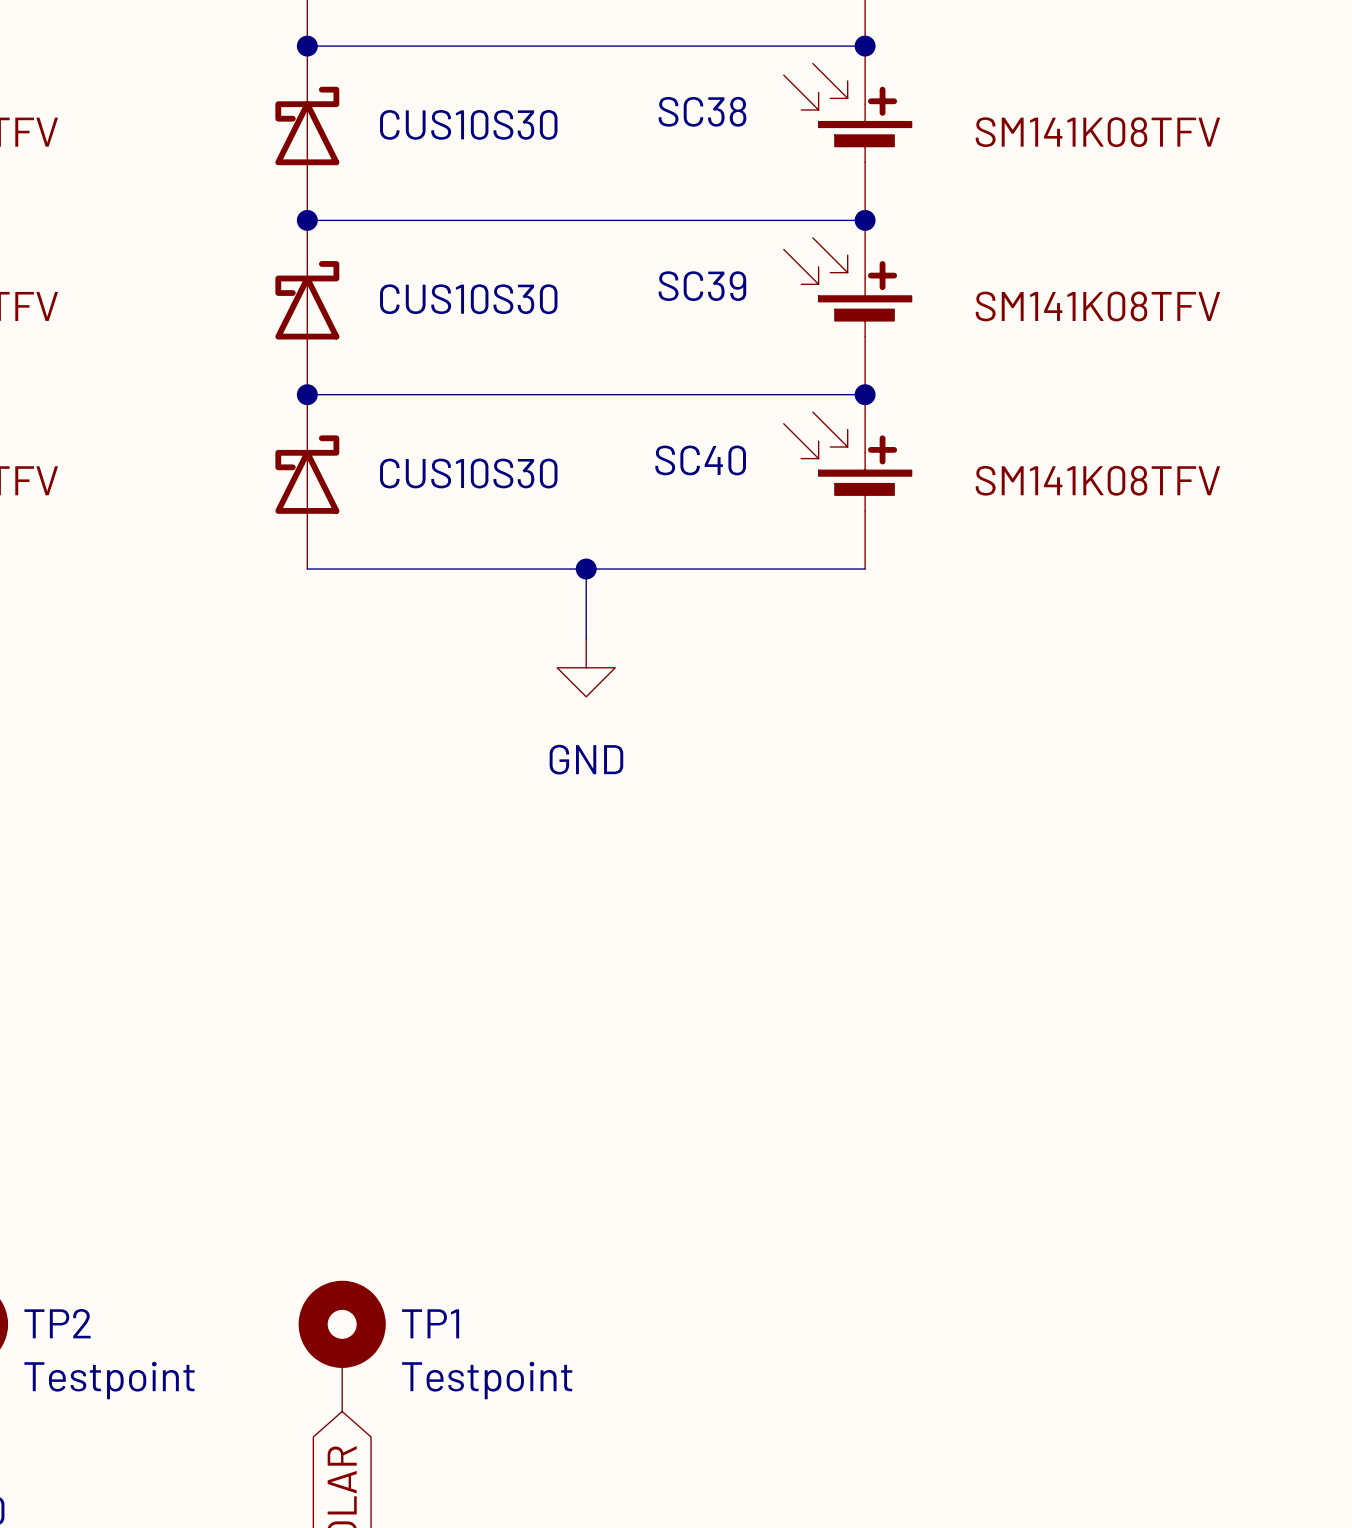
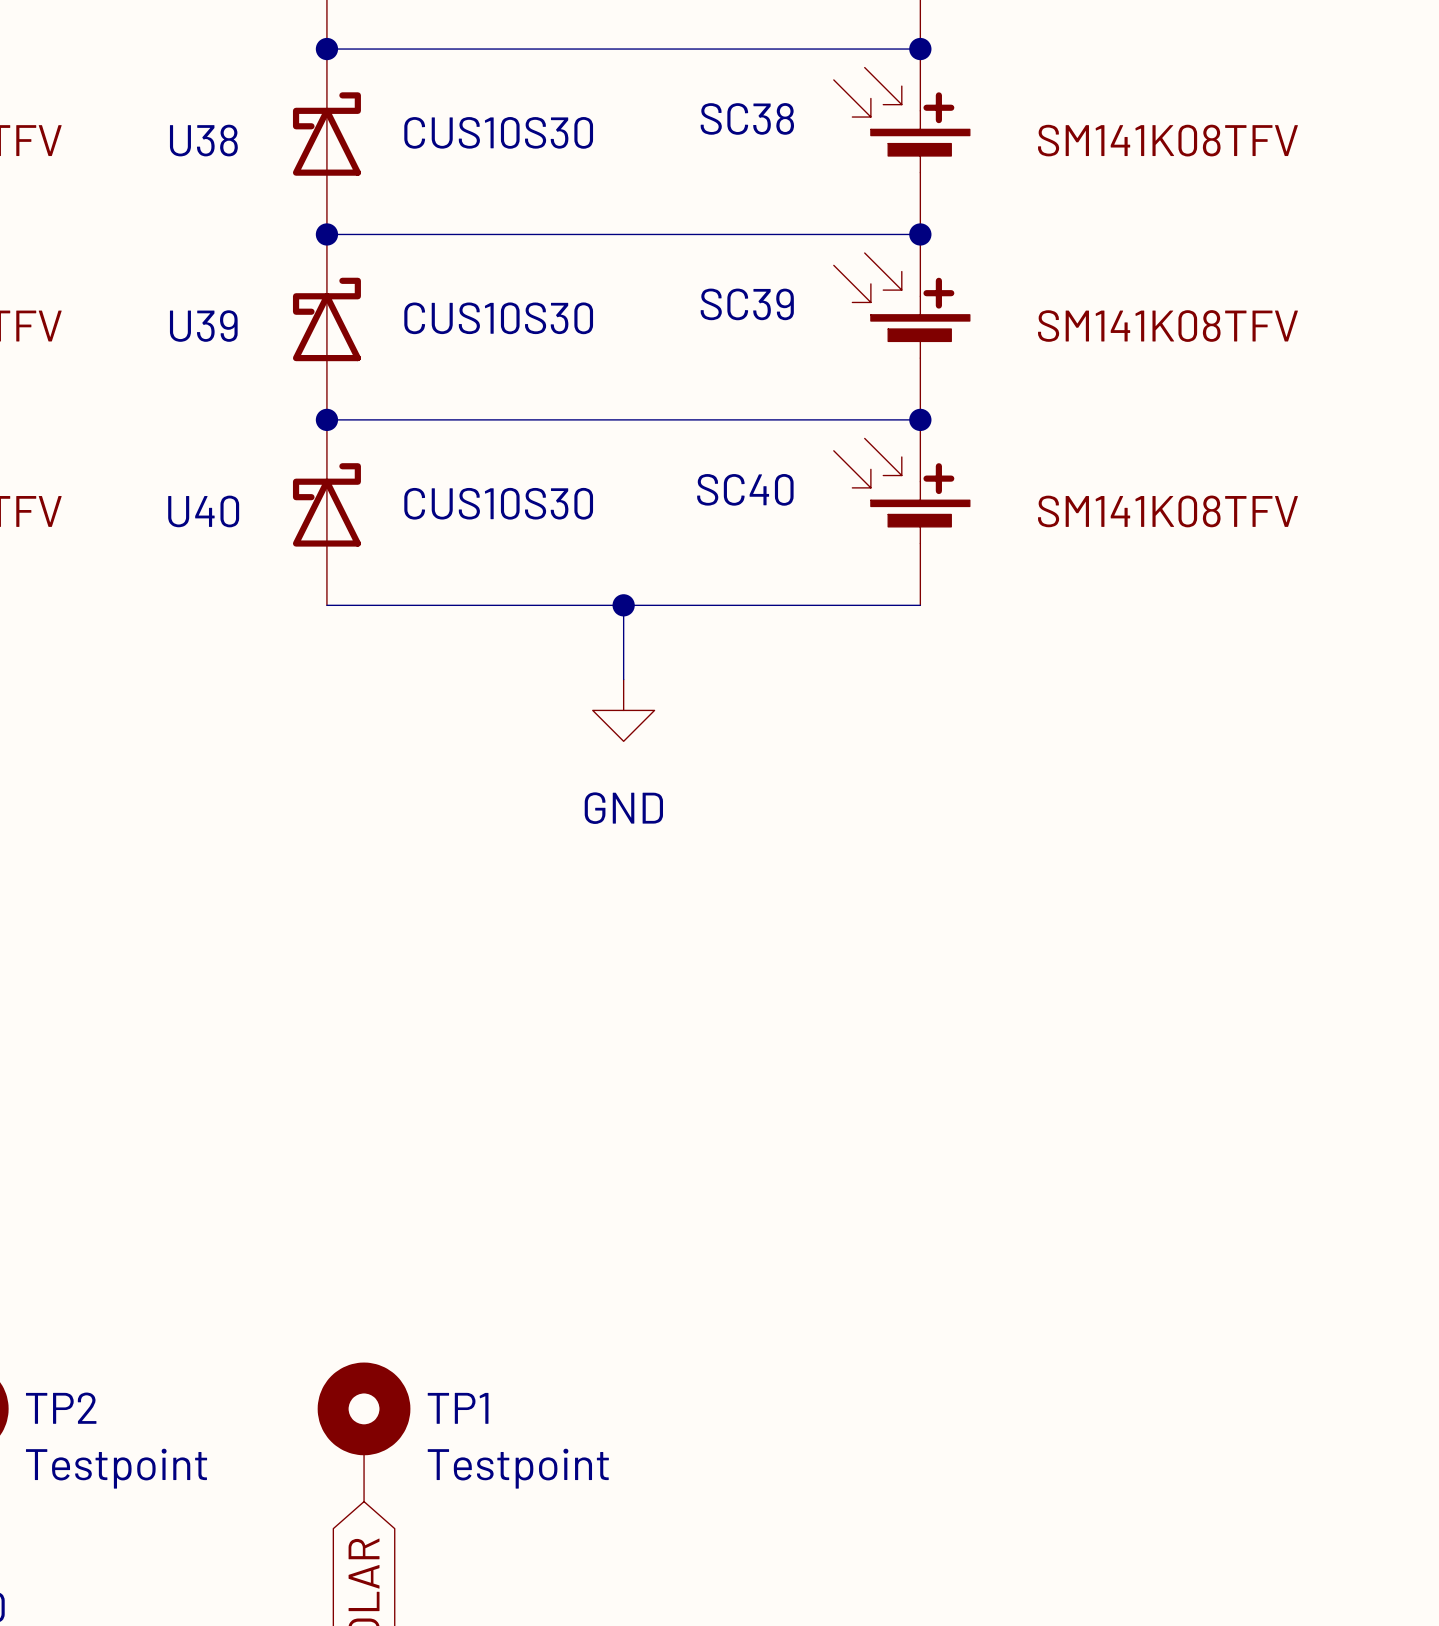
U38 name: none -> U38 (203, 140)
U39 name: none -> U39 (203, 326)
U40 name: none -> U40 (203, 511)

